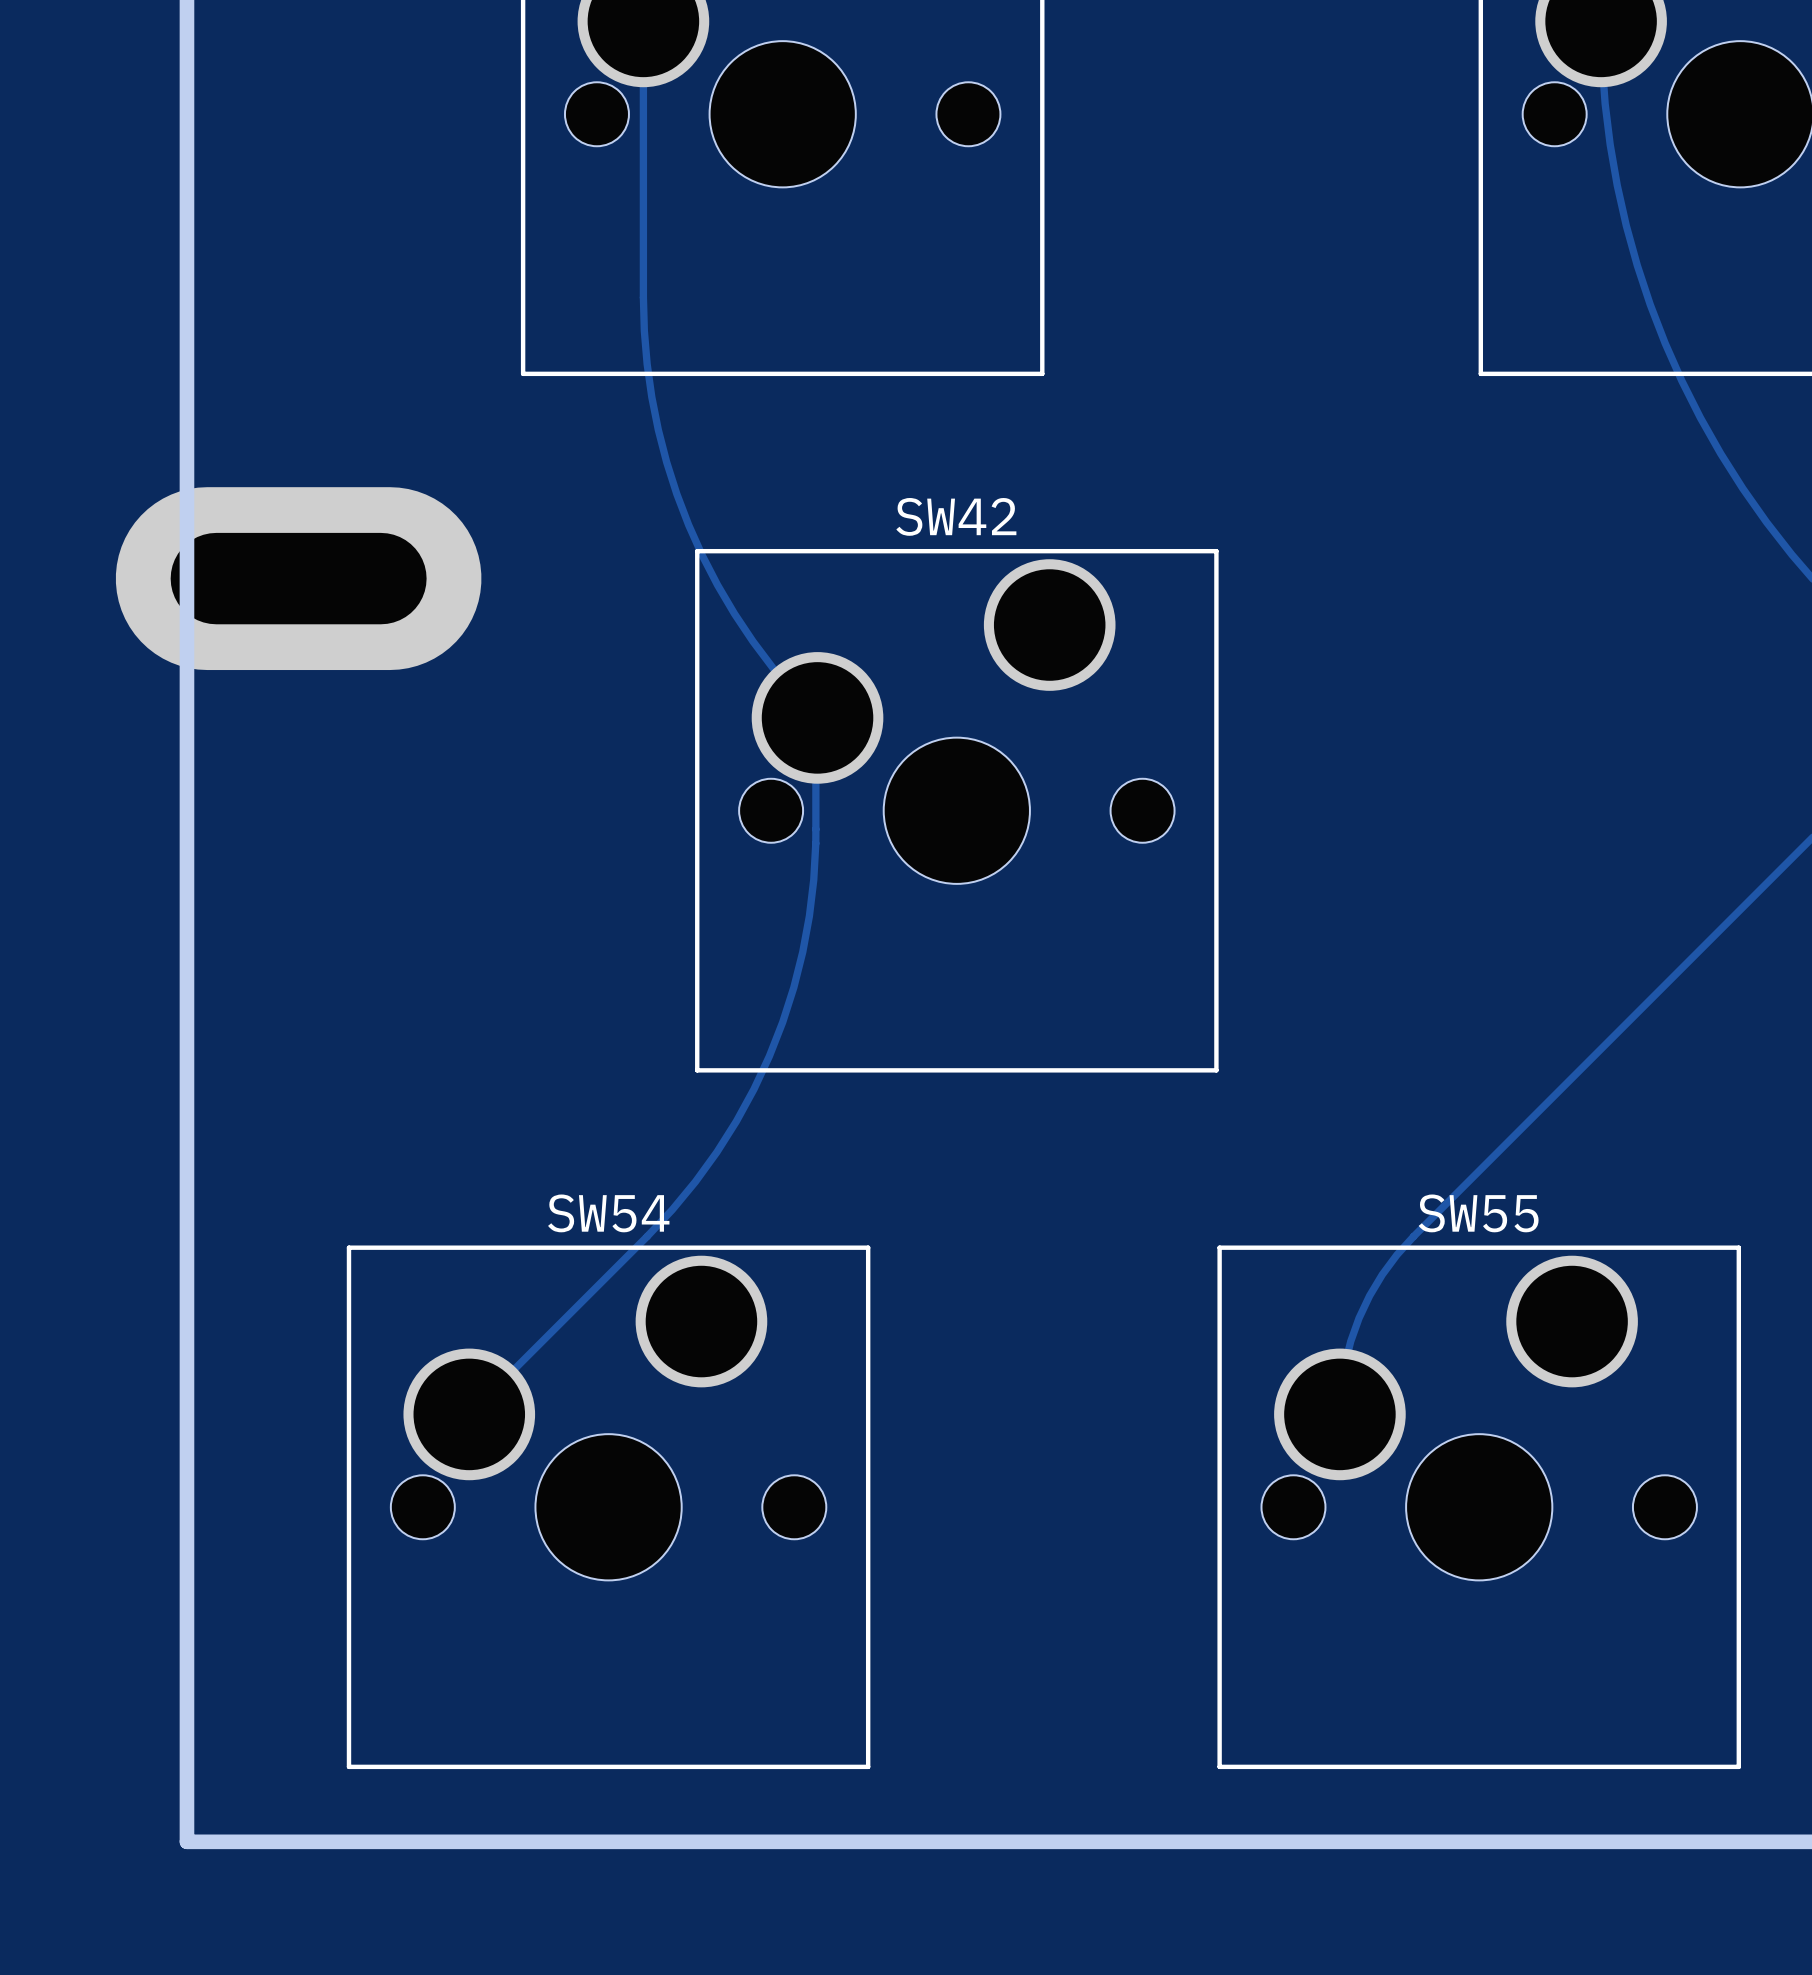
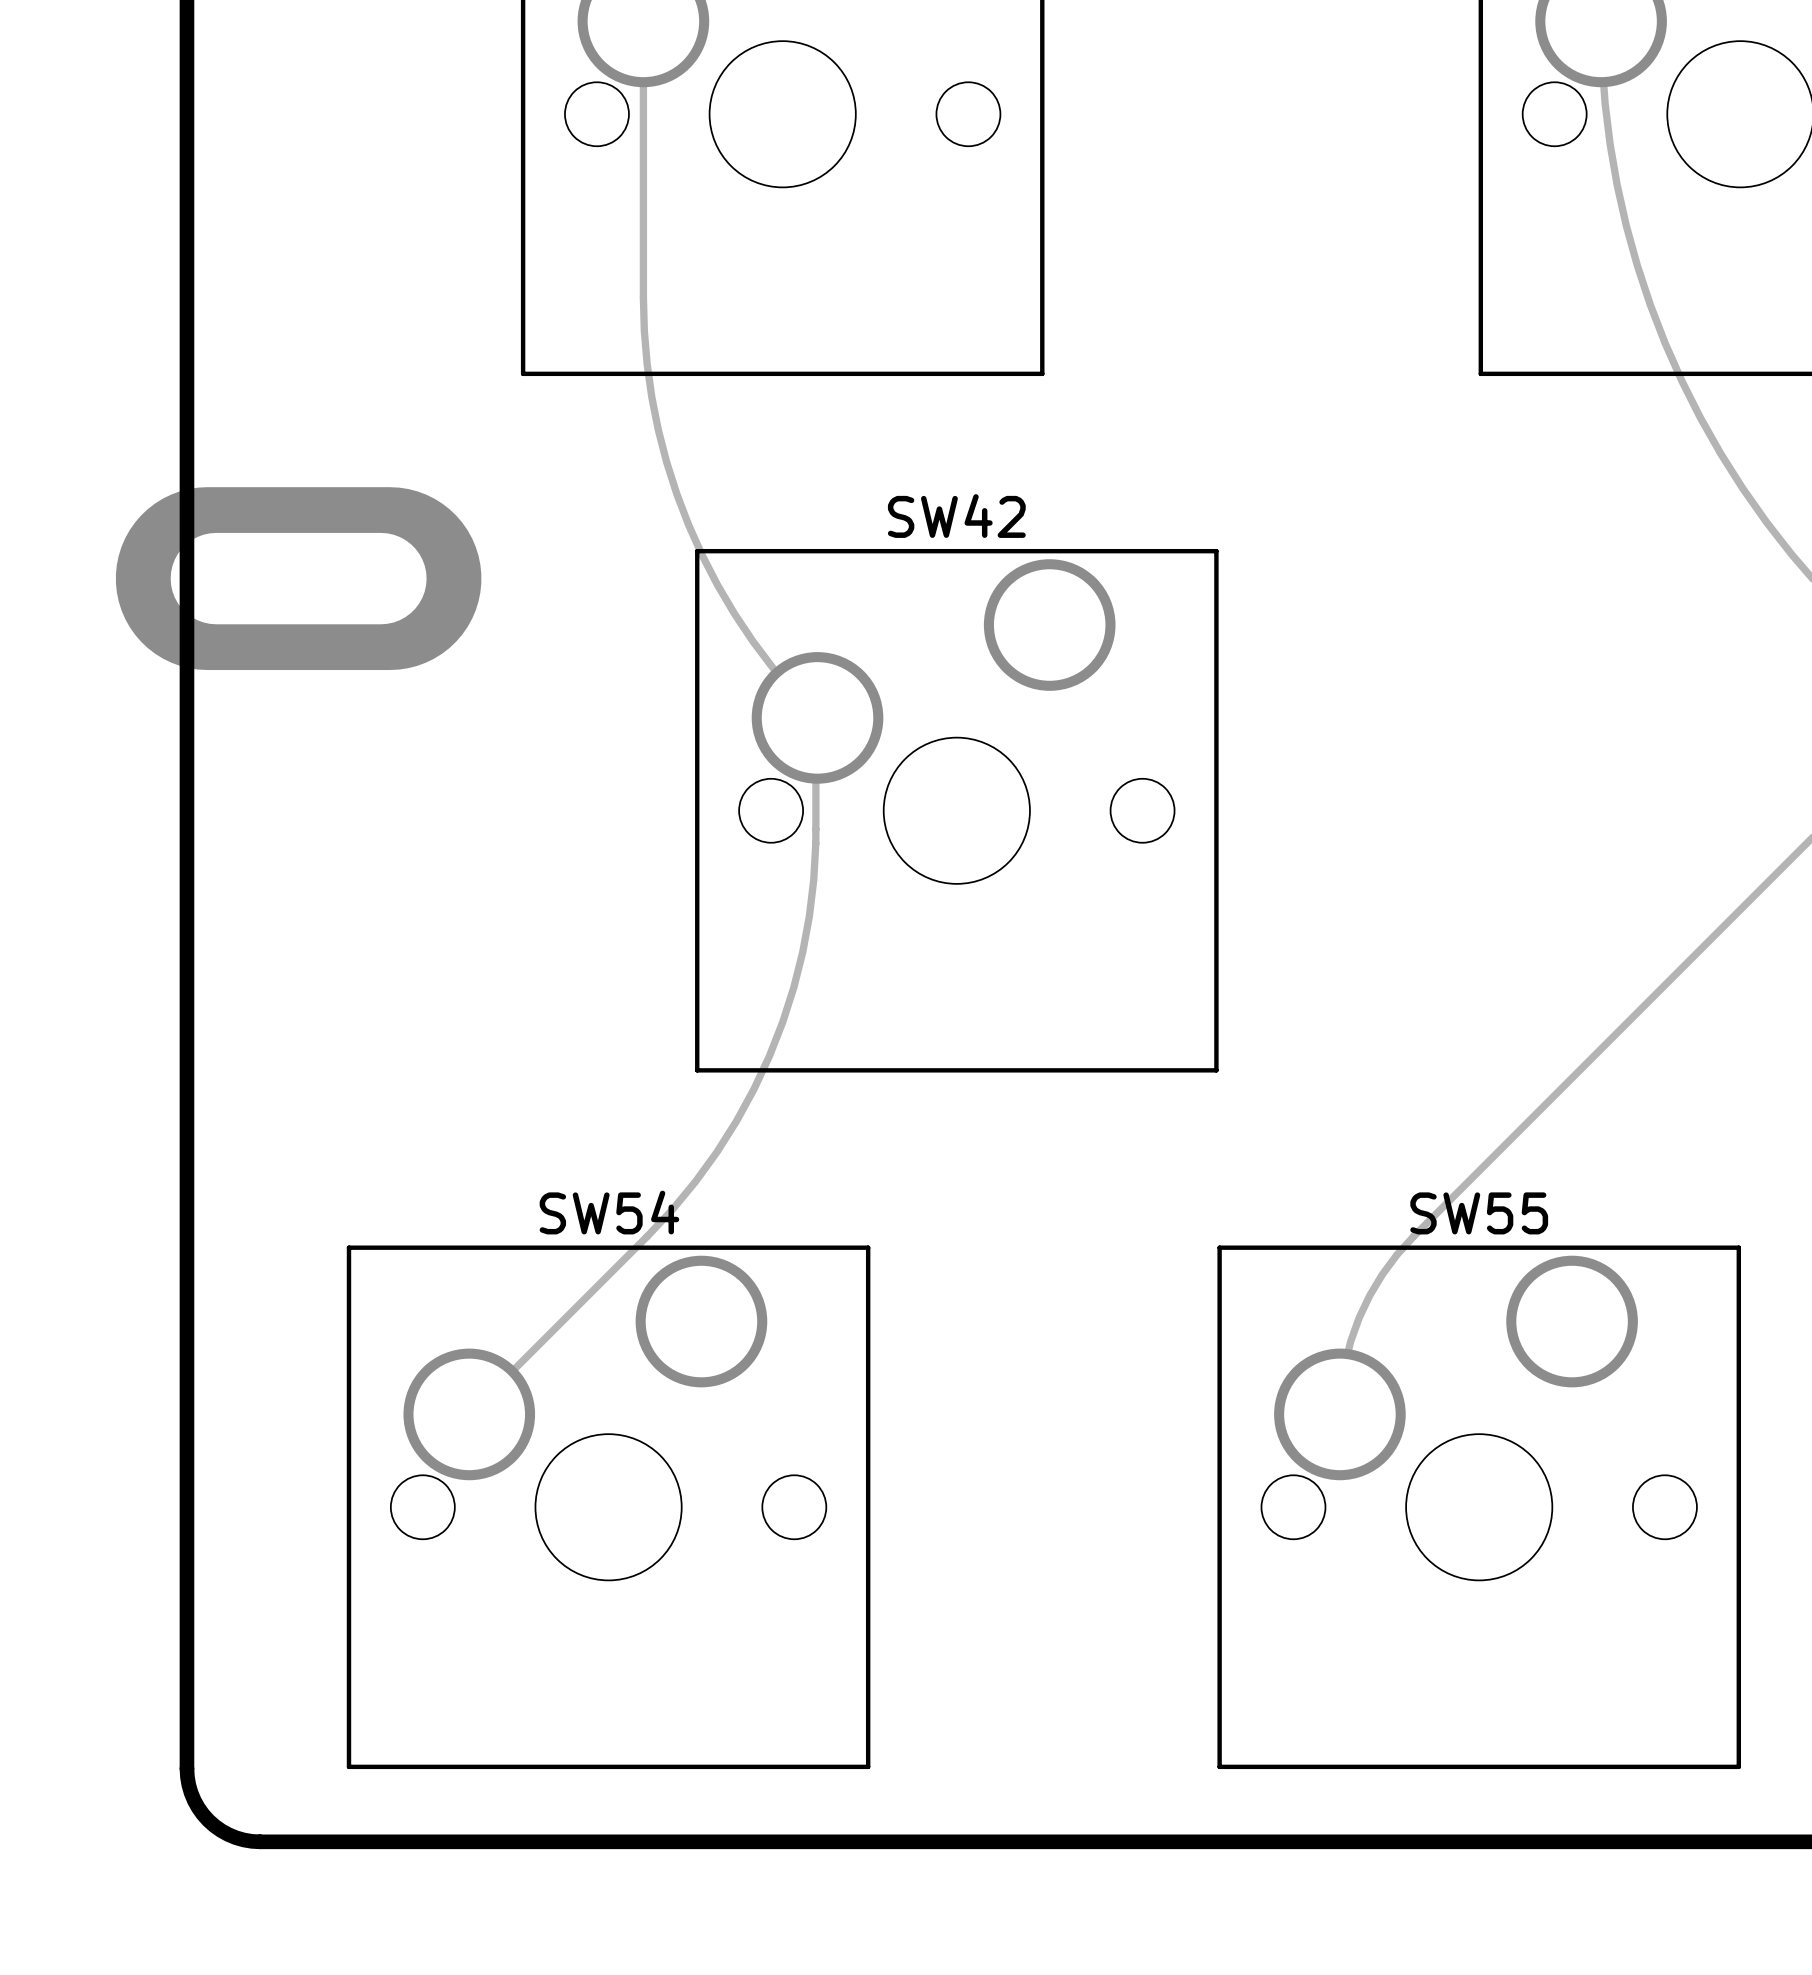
board edge: (186, 1768) (186, 1841) (260, 1841) -> (186, 1768) (188, 1784) (194, 1800) (208, 1820) (221, 1830) (235, 1837) (260, 1841)

